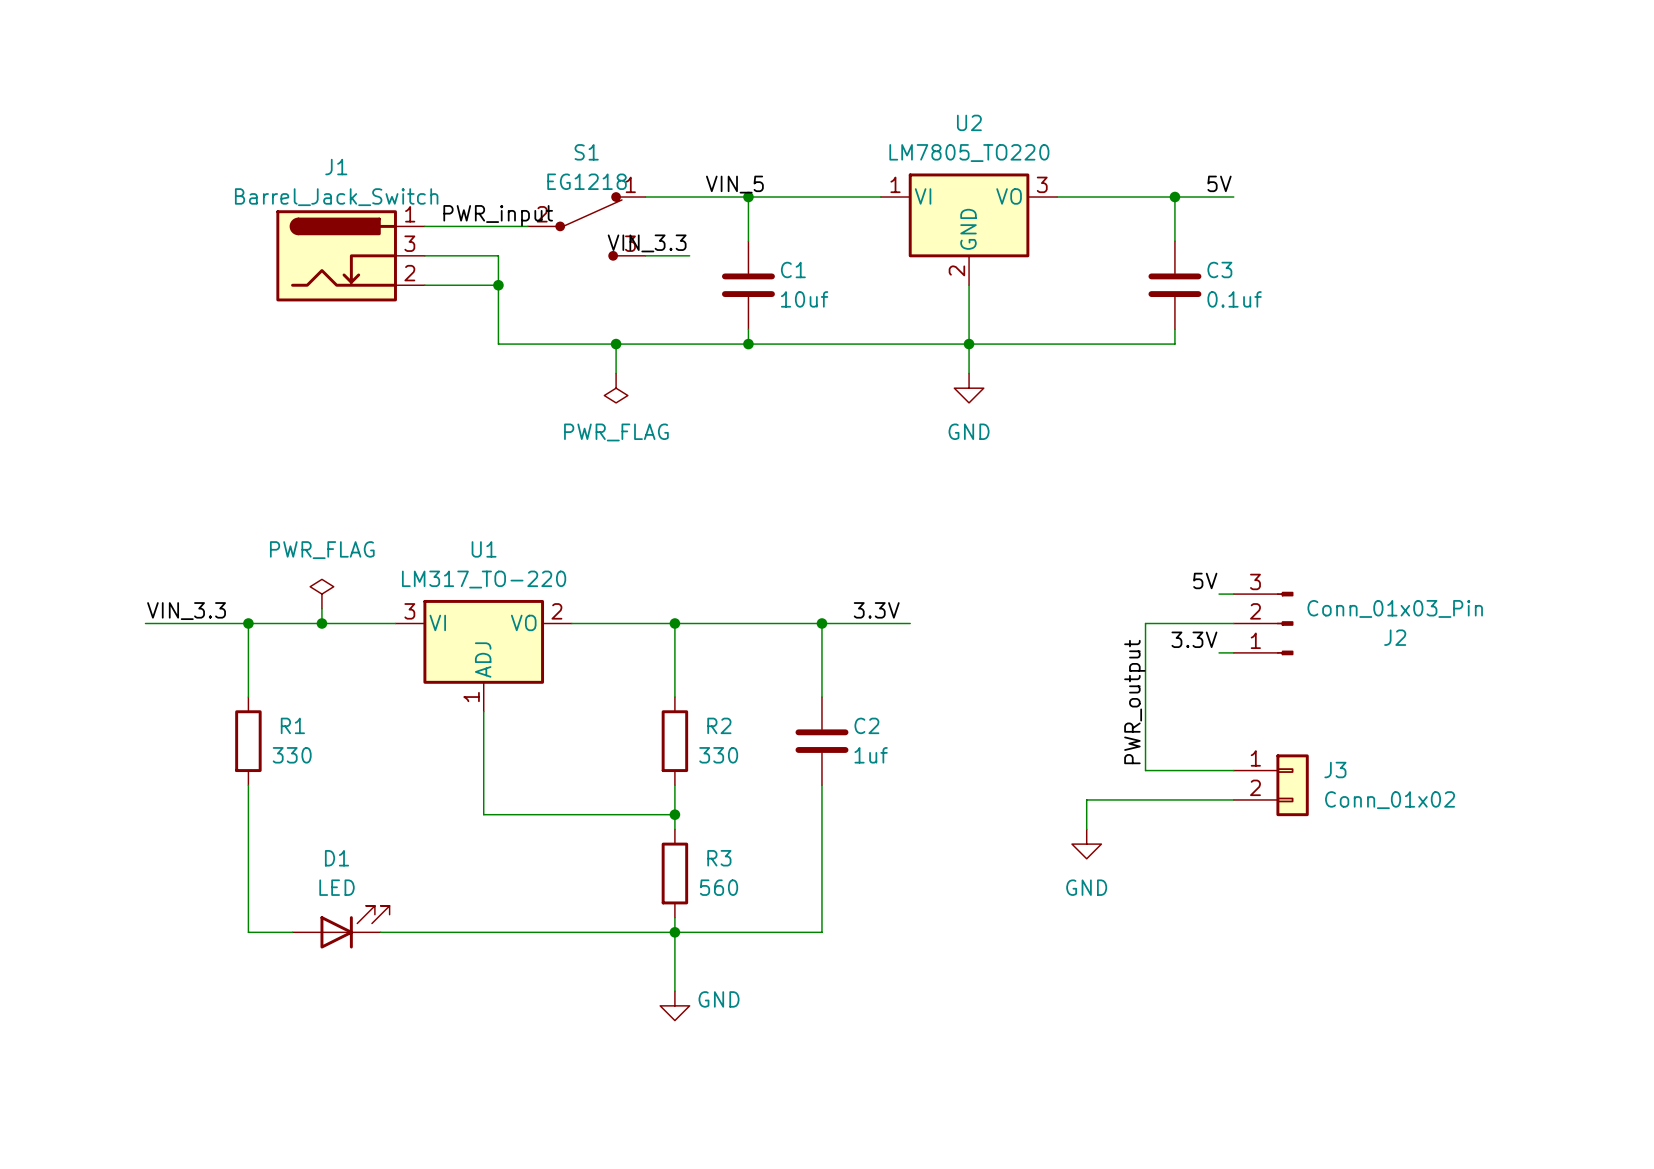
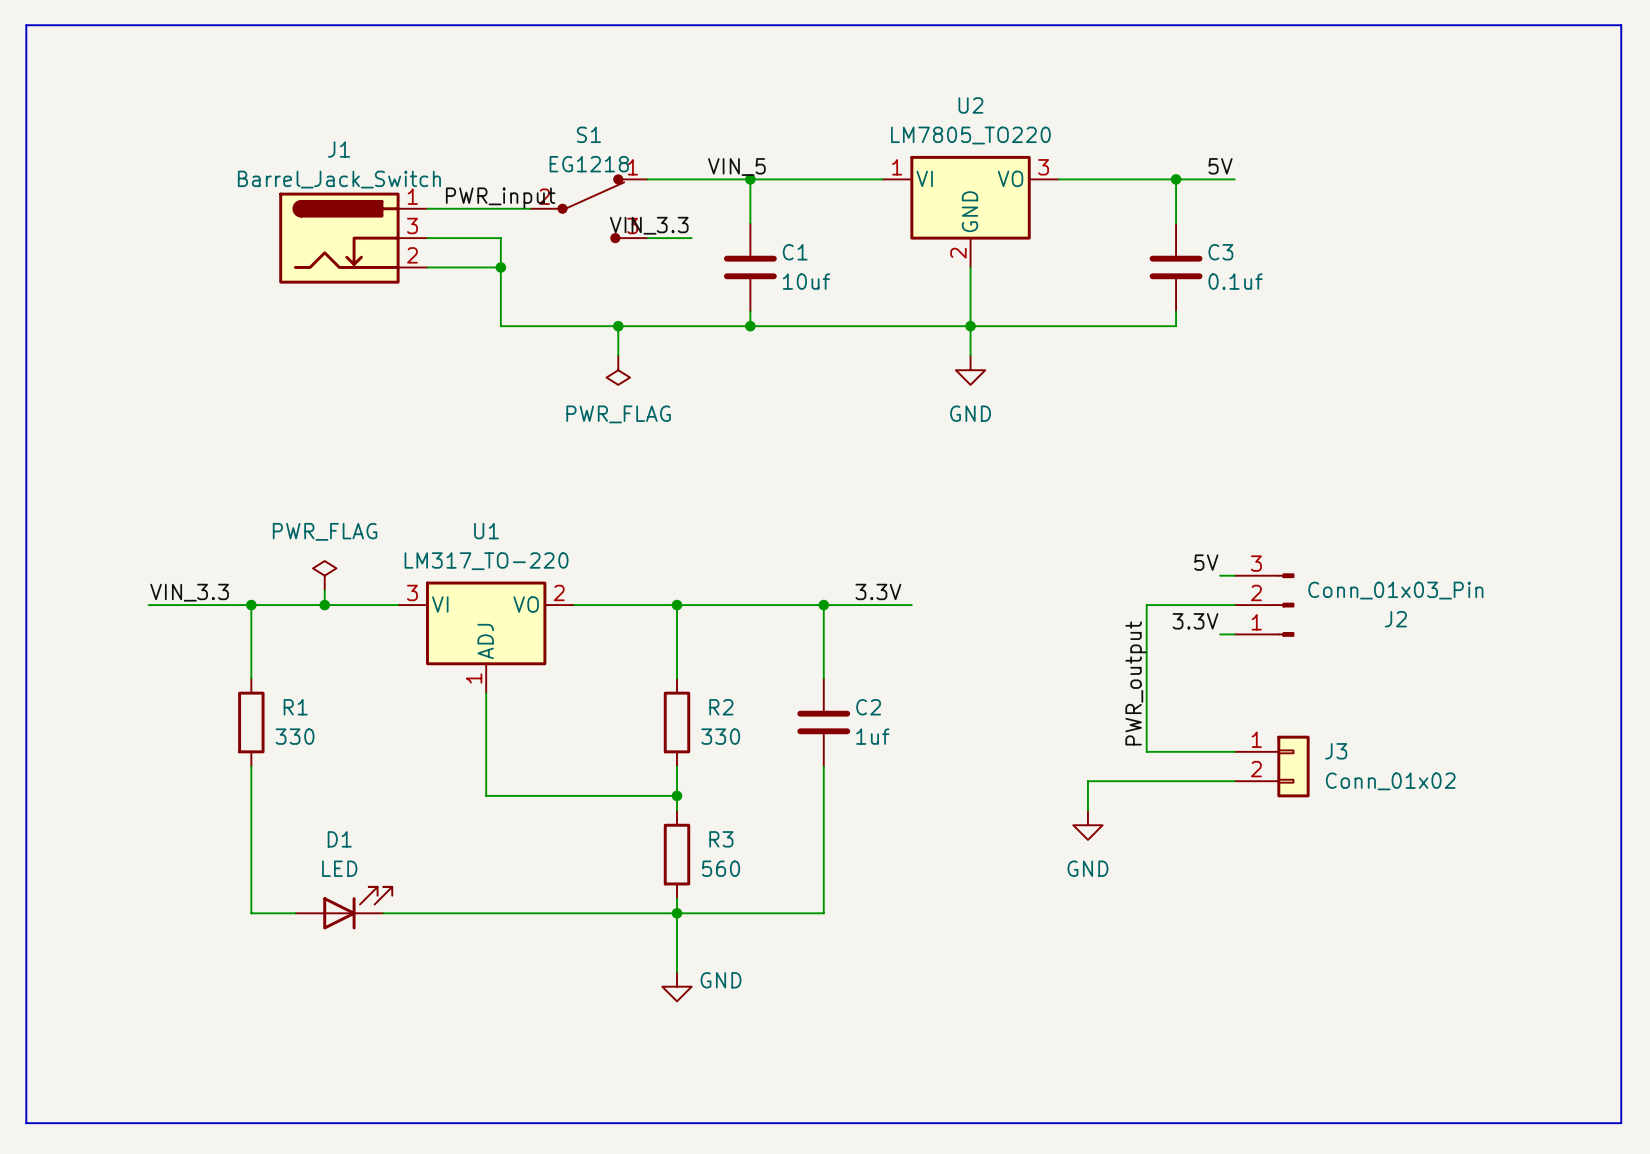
line: none -> (26, 25) (1621, 25) (1621, 1123) (26, 1123) (26, 25)

